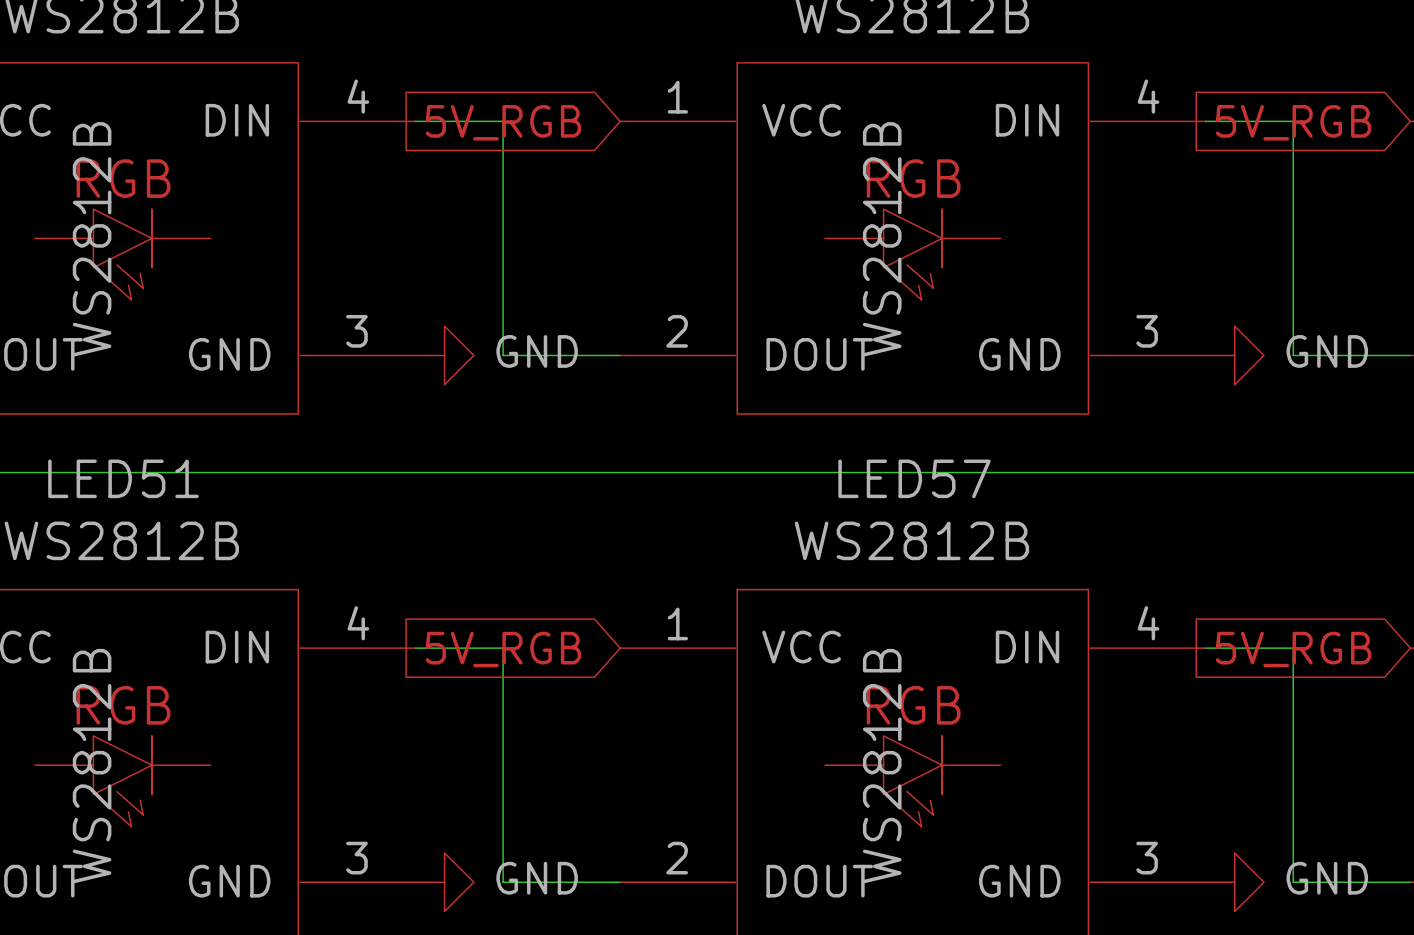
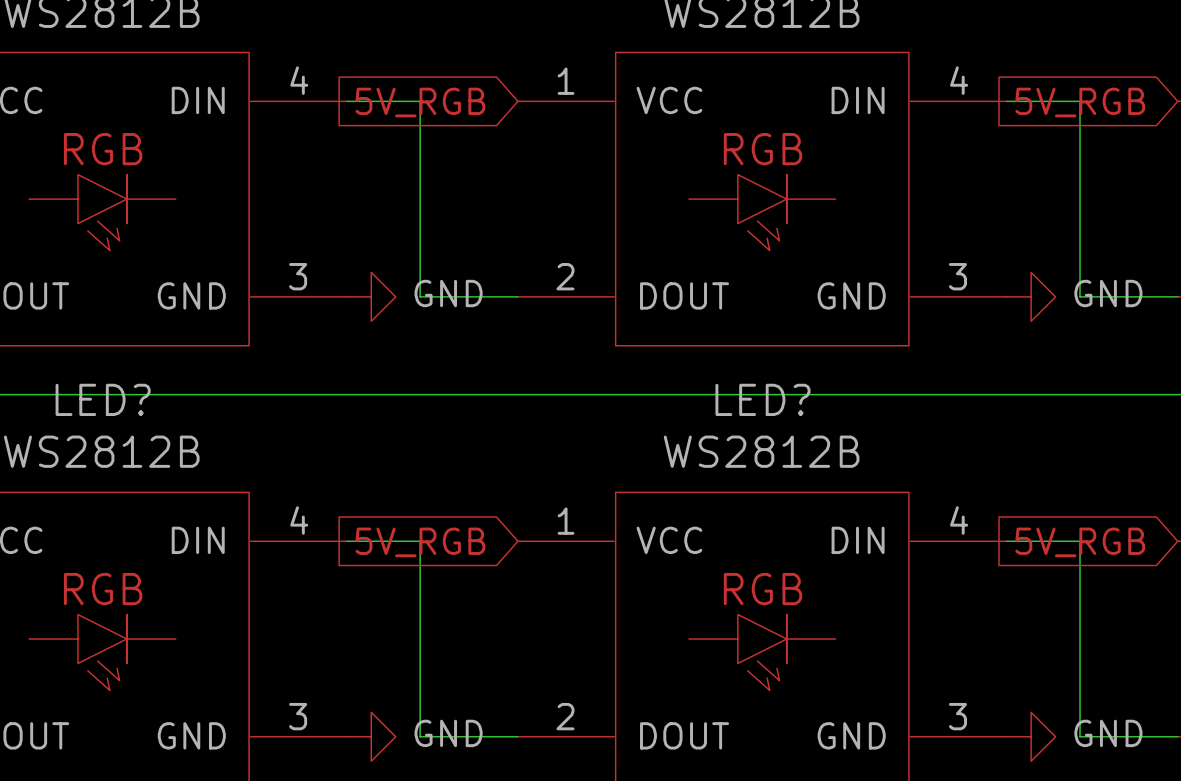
part text: WS2812B (92, 239) -> none
part text: WS2812B (882, 239) -> none
LED51 name: LED51 (123, 478) -> LED? (103, 399)
LED57 name: LED57 (914, 478) -> LED? (762, 399)
LED51 text: WS2812B (92, 766) -> none
LED57 text: WS2812B (882, 766) -> none

